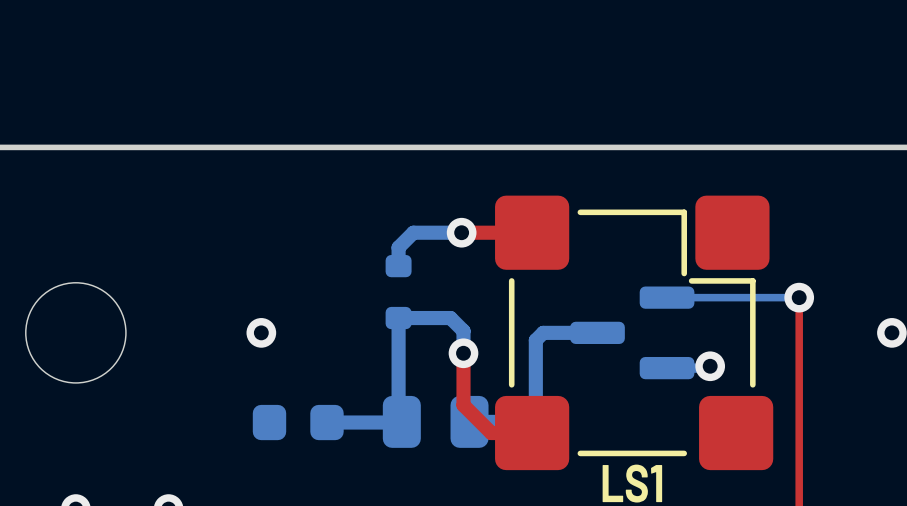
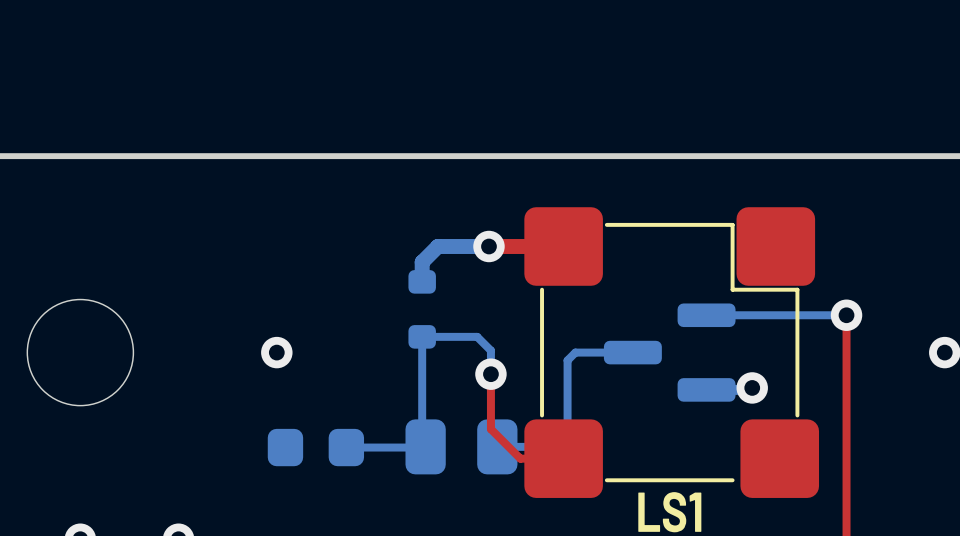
LS1 footprint: [495, 195, 774, 471] -> [524, 207, 820, 498]
bottom track width: thick (597, 332) (543, 332) (535, 340) (535, 399) (513, 421) (469, 421) -> thin (632, 352) (575, 352) (567, 360) (567, 423) (543, 446) (497, 446)
top track width: thick (463, 353) (463, 405) (491, 433) (532, 433) -> thin (490, 374) (490, 429) (520, 458) (563, 458)
bottom track width: thick (463, 353) (463, 331) (450, 318) (398, 318) (398, 418) -> thin (490, 374) (490, 350) (477, 336) (422, 336) (422, 443)
bottom track width: thick (333, 422) (401, 422) -> thin (353, 447) (424, 447)

